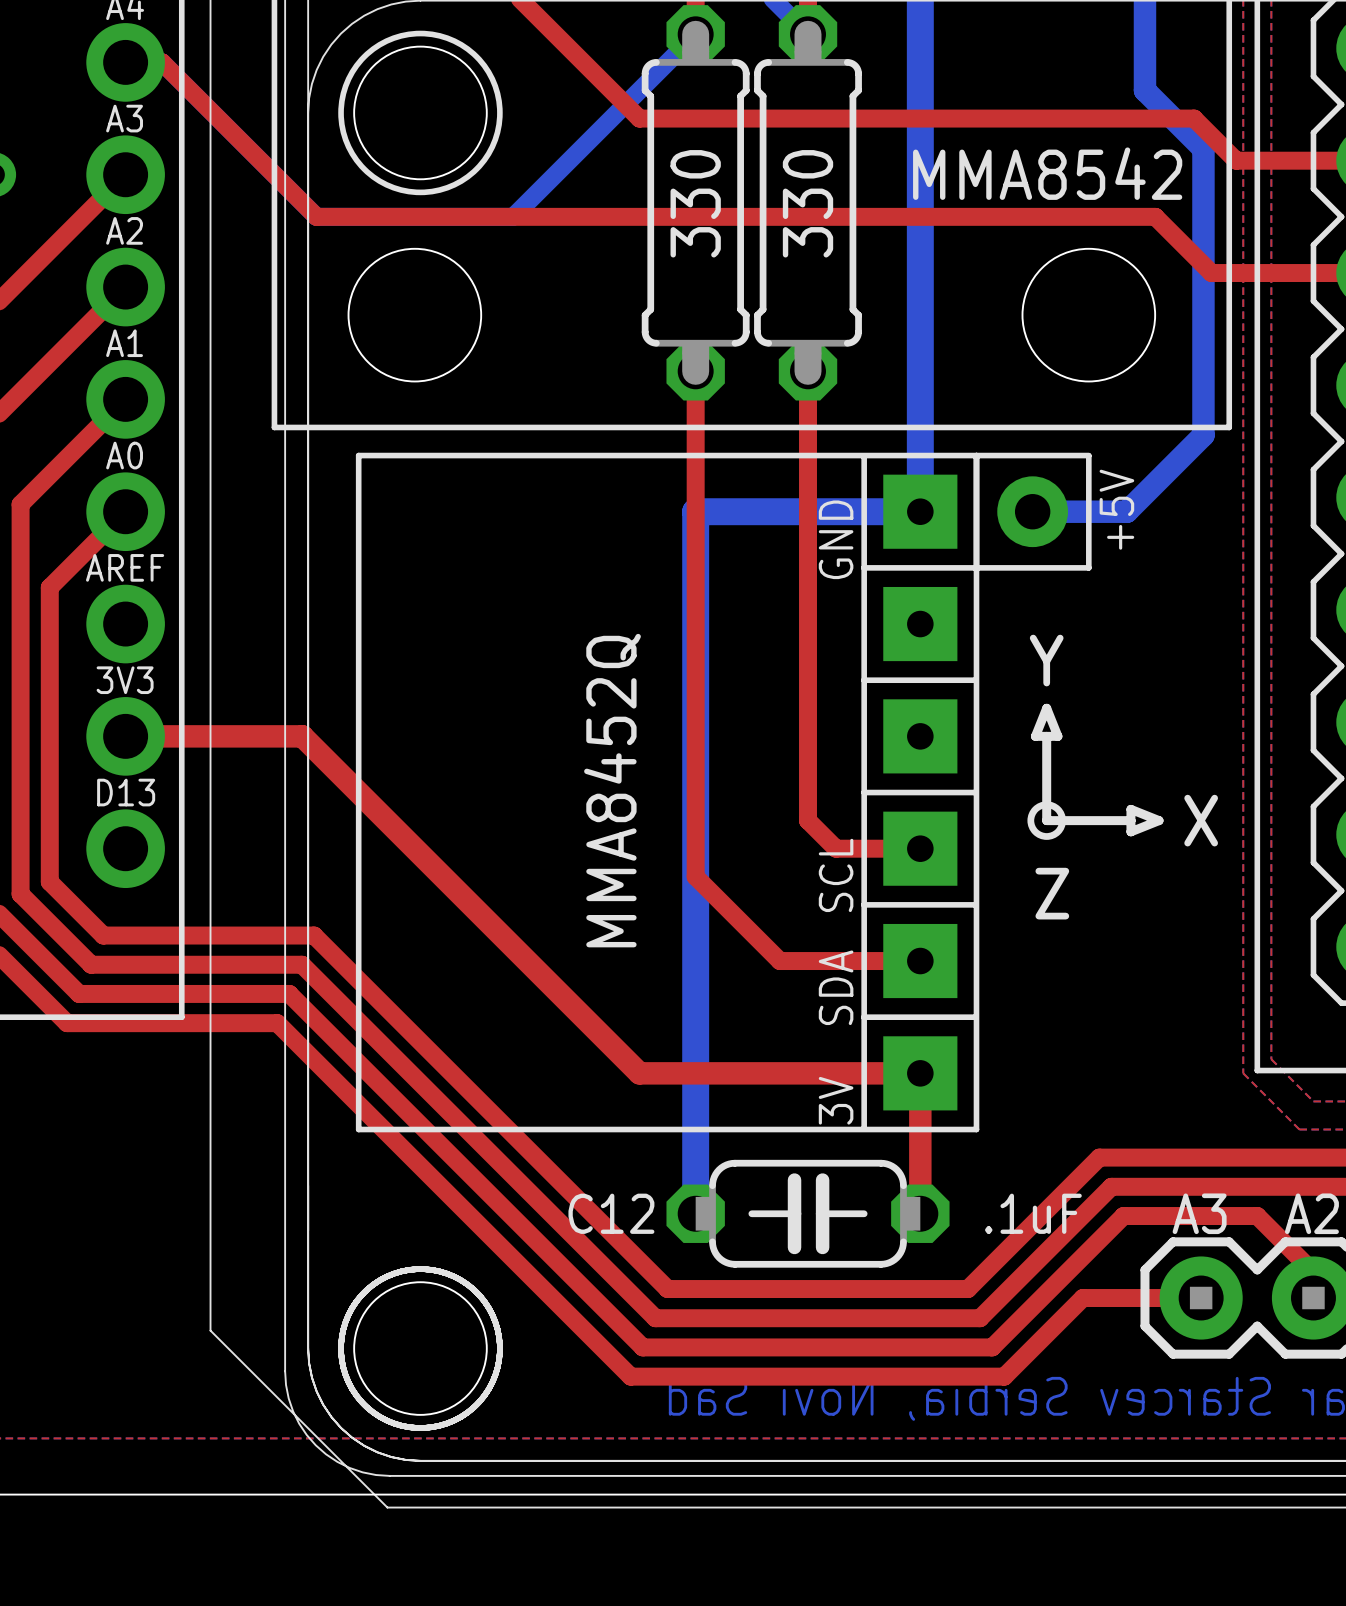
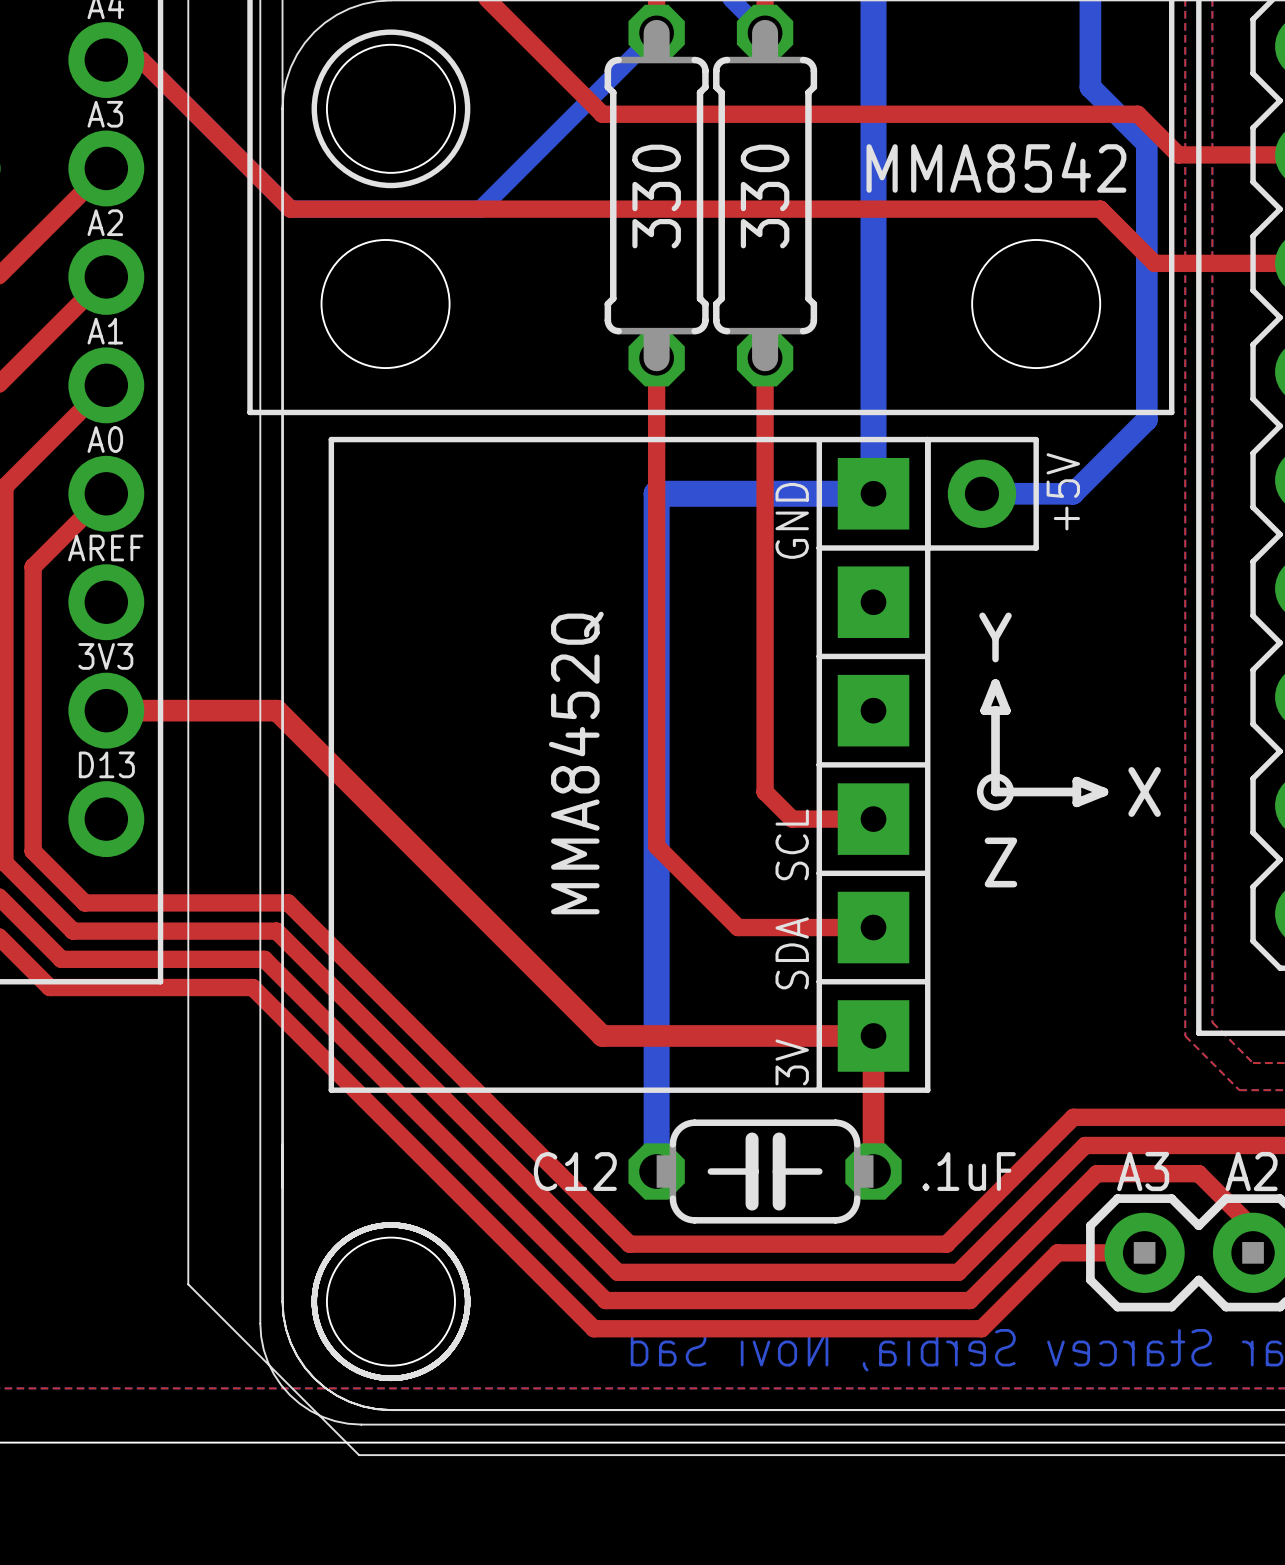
top track: (1127, 1157) (1099, 1157) (967, 1289) -> (1073, 1117) (946, 1244) (919, 1244)
top track: (1139, 1186) (1111, 1186) (980, 1318) -> (1085, 1145) (958, 1272) (931, 1272)
text position: .1uF (1033, 1213) -> .1uF (969, 1171)
top track: (1151, 1216) (1123, 1216) (992, 1347) -> (1096, 1173) (969, 1300) (942, 1300)
top track: (1110, 1298) (1082, 1298) (1004, 1376) -> (1057, 1252) (981, 1328) (954, 1328)

